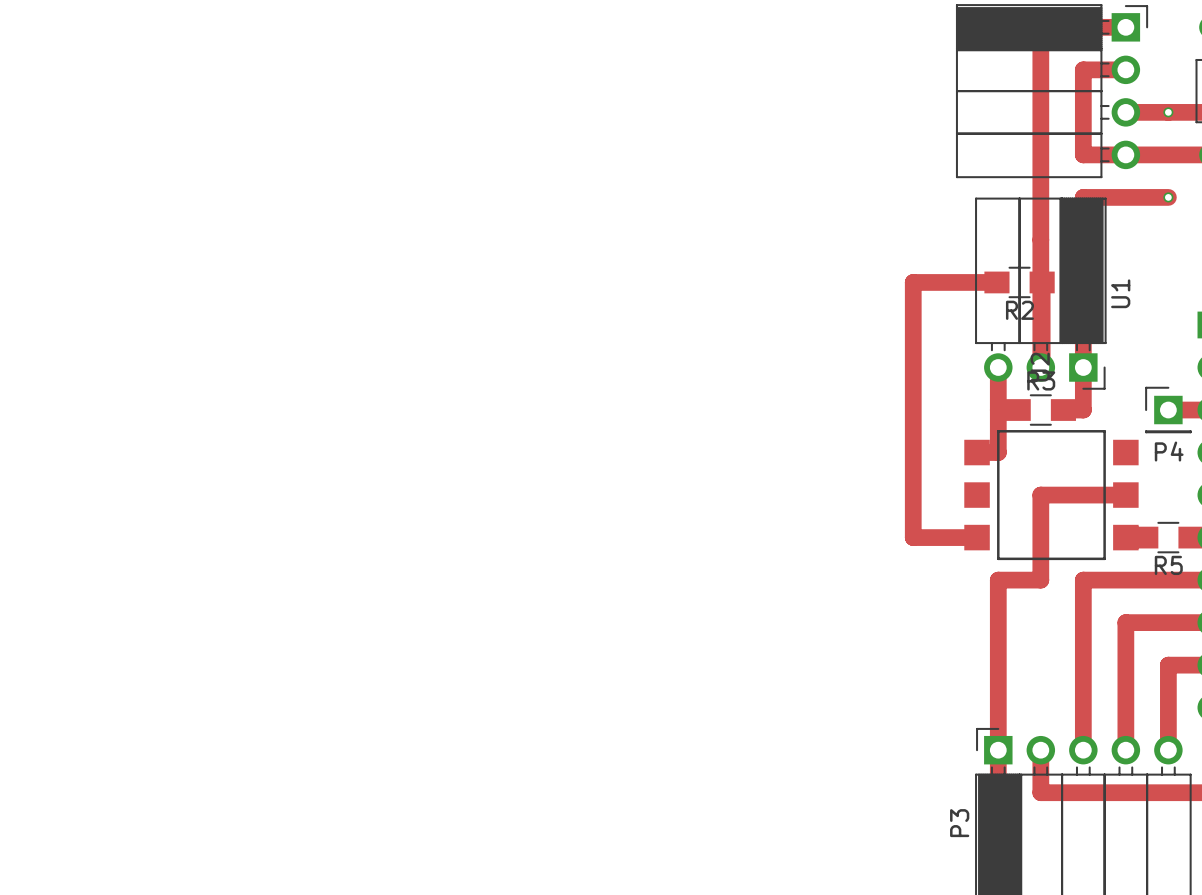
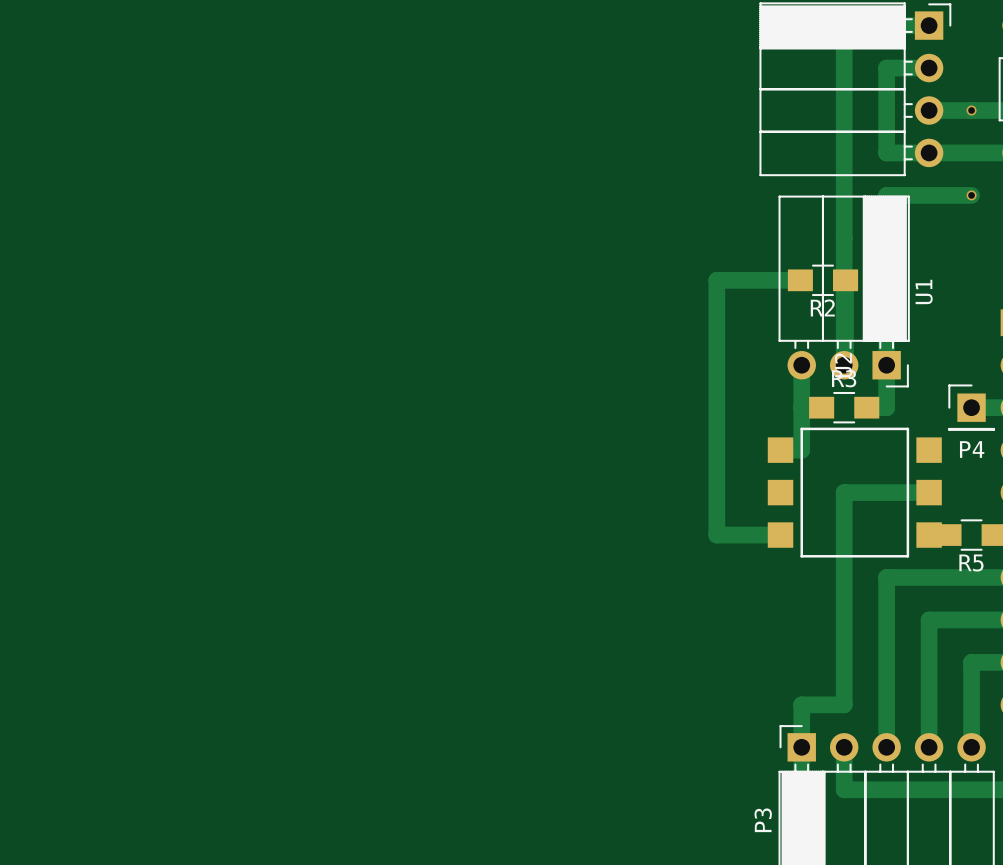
track: (1040, 580) (998, 580) (998, 707) -> (844, 577) (844, 704) (801, 704)

